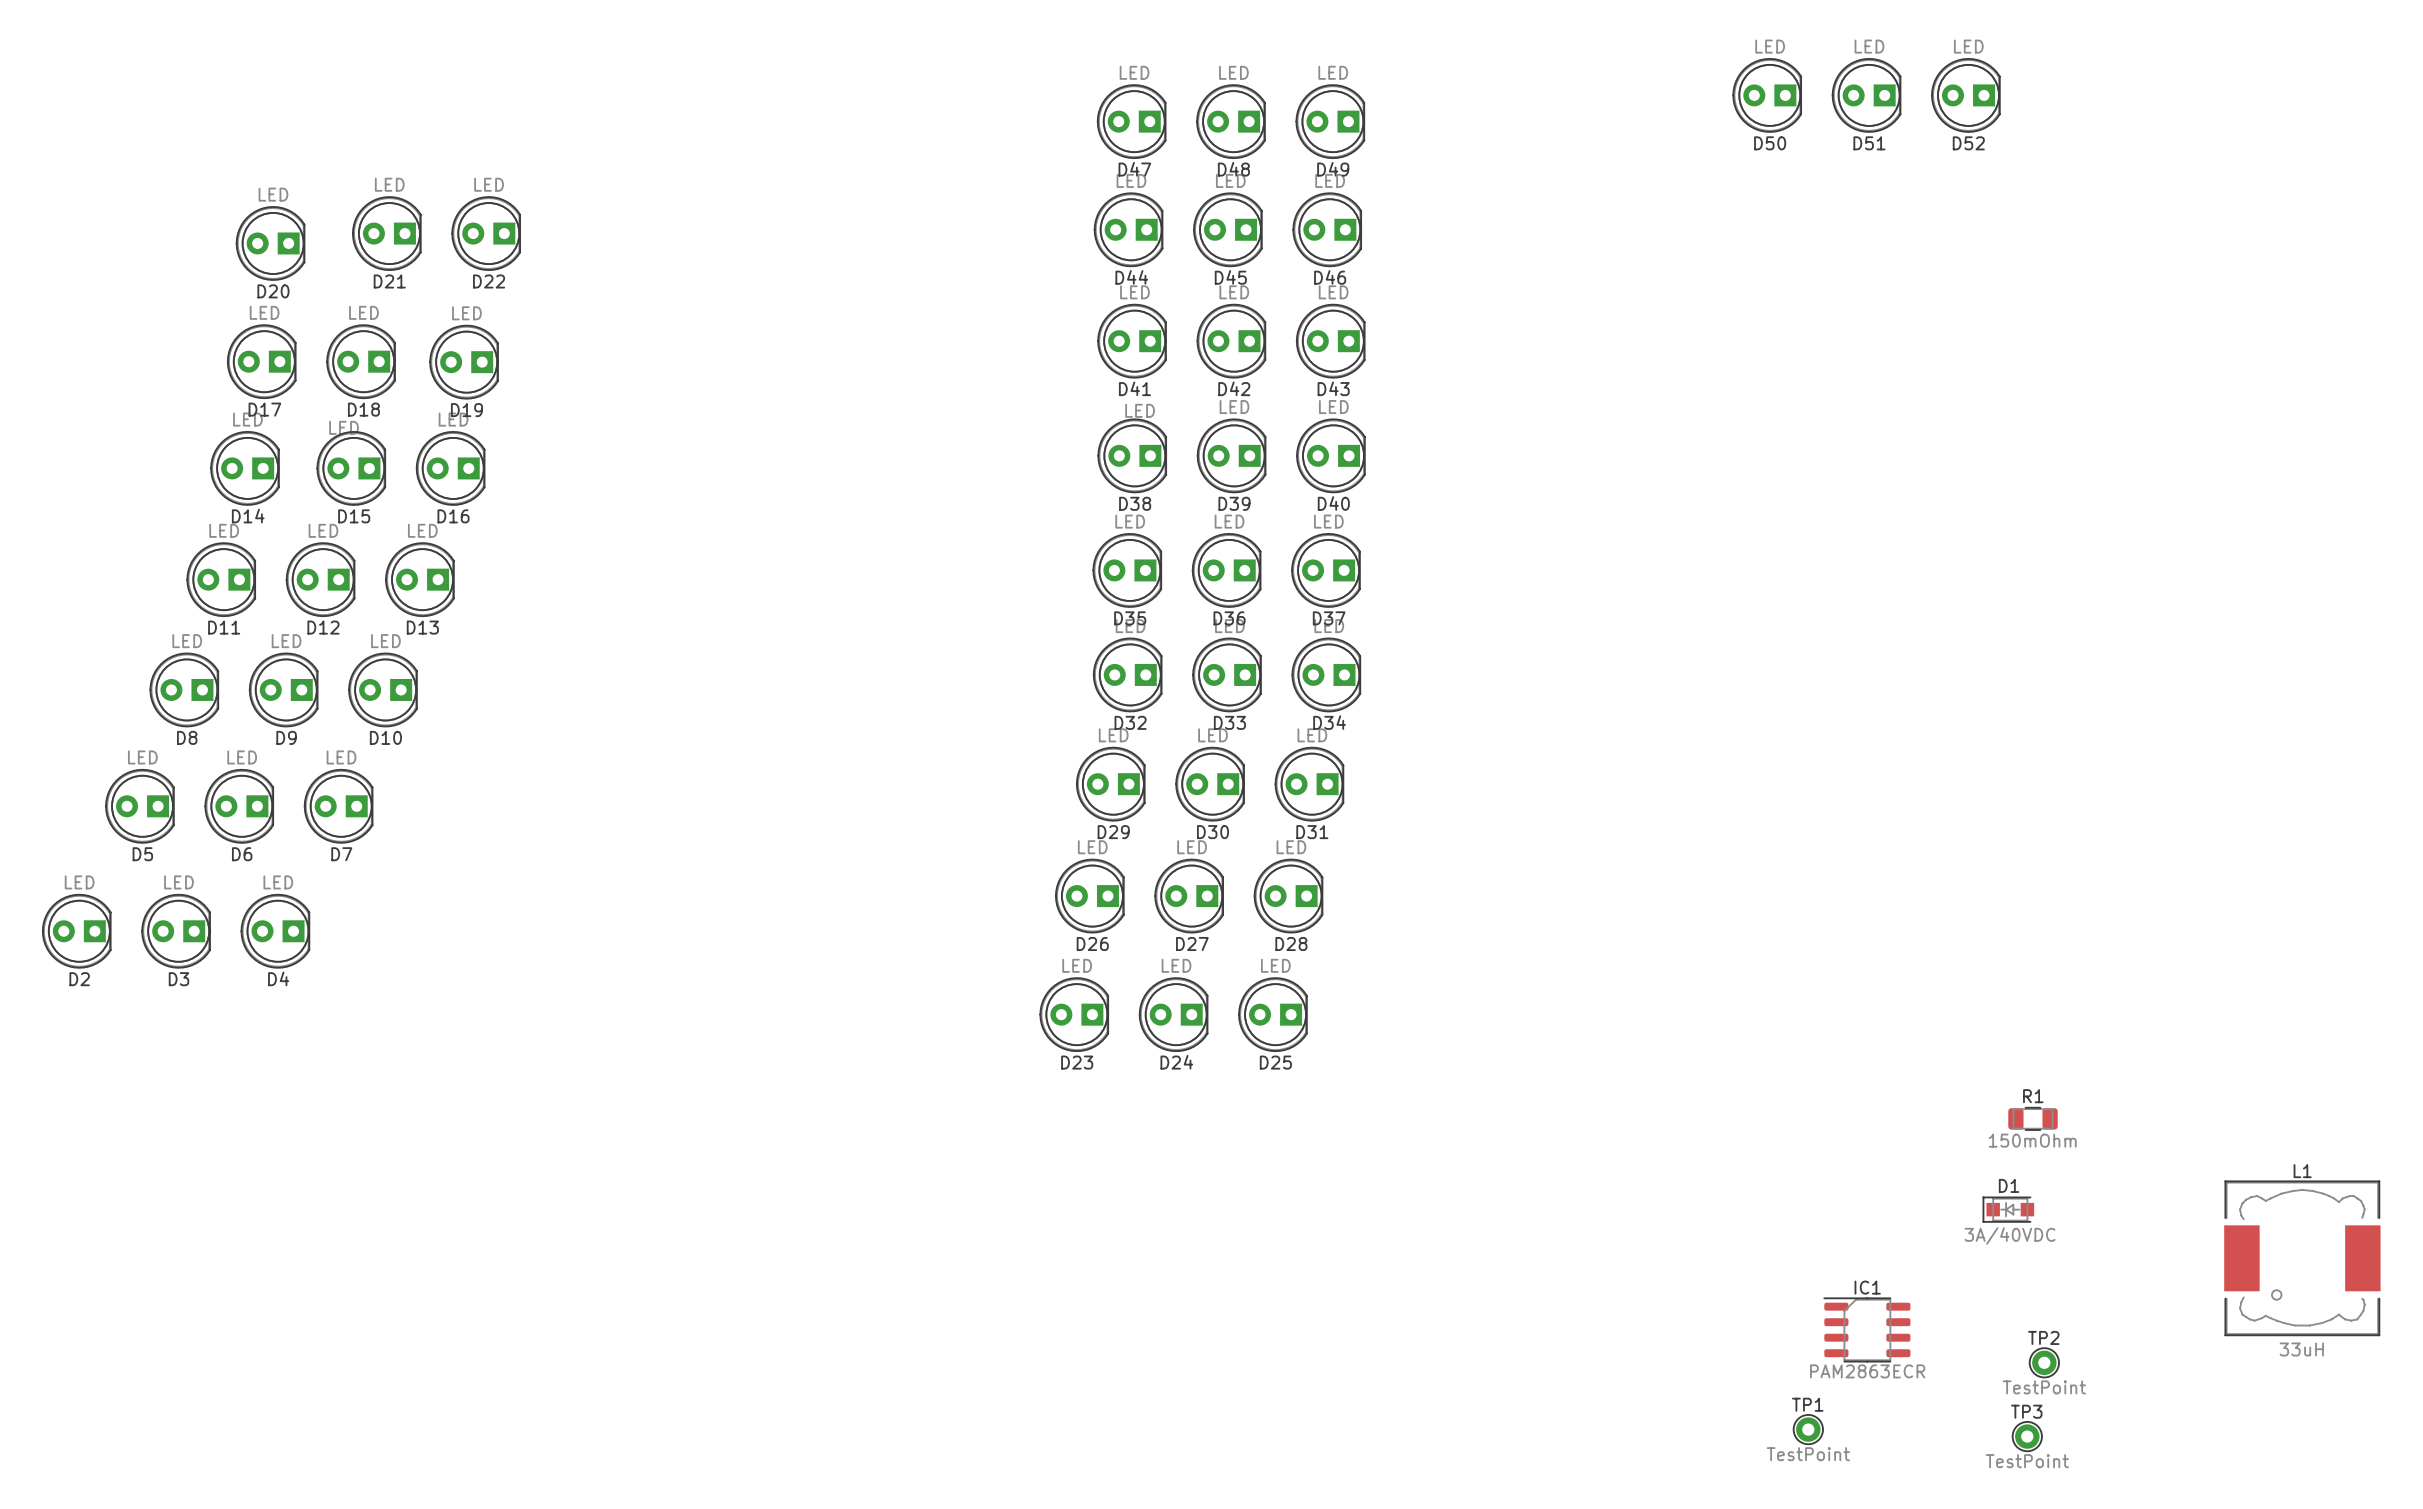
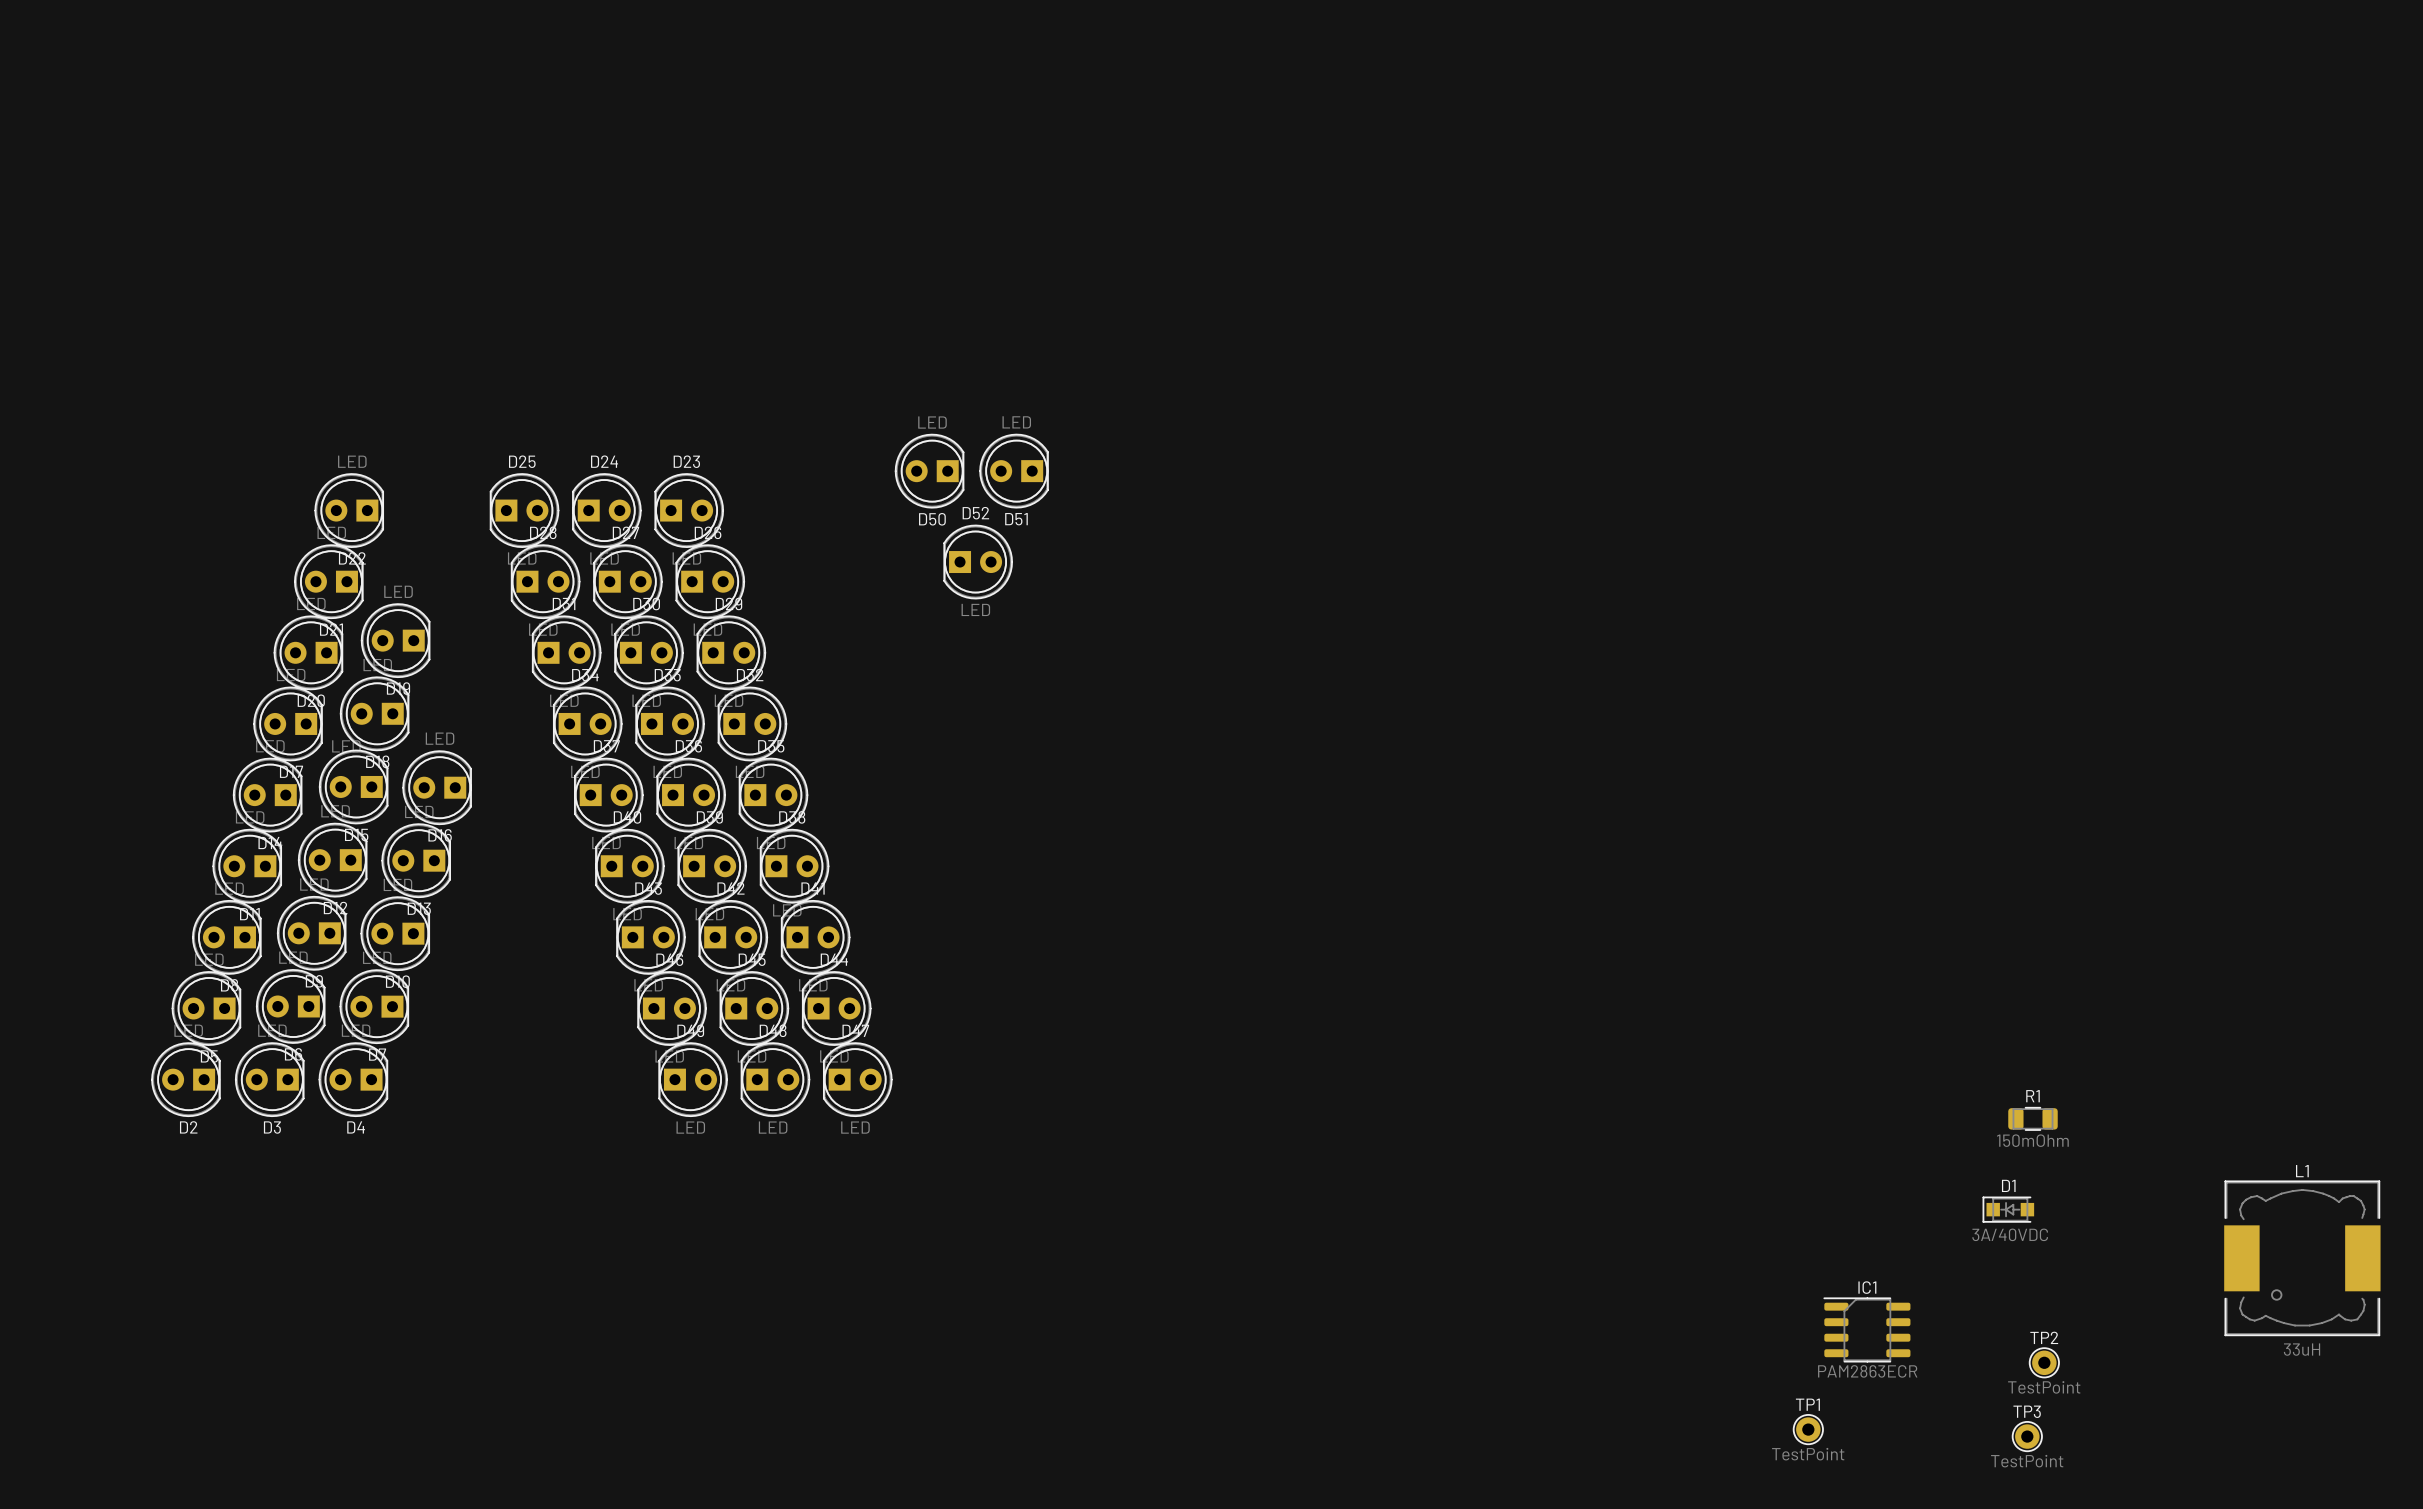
D50 position: (1767, 95) -> (929, 471)
D51 position: (1866, 95) -> (1014, 471)
D52 rotation: 0° (1965, 95) -> 180° (978, 562)
D52 position: (1965, 95) -> (978, 562)
D47 rotation: 0° (1131, 121) -> 180° (857, 1079)
D47 position: (1131, 121) -> (857, 1079)
D48 rotation: 0° (1230, 121) -> 180° (775, 1079)
D48 position: (1230, 121) -> (775, 1079)
D49 rotation: 0° (1330, 121) -> 180° (693, 1079)
D49 position: (1330, 121) -> (693, 1079)
D44 rotation: 0° (1128, 229) -> 180° (836, 1008)
D44 position: (1128, 229) -> (836, 1008)
D45 rotation: 0° (1227, 229) -> 180° (754, 1008)
D45 position: (1227, 229) -> (754, 1008)
D46 rotation: 0° (1327, 229) -> 180° (672, 1008)
D46 position: (1327, 229) -> (672, 1008)
D21 position: (386, 233) -> (328, 581)
D22 position: (486, 233) -> (349, 510)
D20 position: (270, 243) -> (308, 652)
D41 rotation: 0° (1132, 341) -> 180° (815, 937)
D41 position: (1132, 341) -> (815, 937)
D42 rotation: 0° (1231, 341) -> 180° (733, 937)
D42 position: (1231, 341) -> (733, 937)
D43 rotation: 0° (1330, 341) -> 180° (650, 937)
D43 position: (1330, 341) -> (650, 937)
D17 position: (261, 361) -> (288, 723)
D18 position: (361, 361) -> (374, 713)
D19 position: (464, 362) -> (395, 640)
D38 rotation: 0° (1132, 455) -> 180° (794, 866)
D38 position: (1132, 455) -> (794, 866)
D39 rotation: 0° (1231, 455) -> 180° (712, 866)
D39 position: (1231, 455) -> (712, 866)
D40 rotation: 0° (1330, 455) -> 180° (629, 866)
D40 position: (1330, 455) -> (629, 866)
D14 position: (245, 468) -> (267, 795)
D15 position: (351, 468) -> (353, 786)
D16 position: (450, 468) -> (437, 787)
D35 rotation: 0° (1127, 570) -> 180° (773, 795)
D35 position: (1127, 570) -> (773, 795)
D36 rotation: 0° (1226, 570) -> 180° (691, 795)
D36 position: (1226, 570) -> (691, 795)
D37 rotation: 0° (1325, 570) -> 180° (608, 795)
D37 position: (1325, 570) -> (608, 795)
D11 position: (221, 579) -> (247, 866)
D12 position: (320, 579) -> (332, 860)
D13 position: (419, 579) -> (416, 860)
D32 rotation: 0° (1127, 674) -> 180° (752, 723)
D32 position: (1127, 674) -> (752, 723)
D33 rotation: 0° (1227, 674) -> 180° (670, 723)
D33 position: (1227, 674) -> (670, 723)
D34 rotation: 0° (1326, 674) -> 180° (587, 723)
D34 position: (1326, 674) -> (587, 723)
D8 position: (184, 689) -> (226, 937)
D9 position: (283, 689) -> (311, 933)
D10 position: (382, 689) -> (395, 933)
D29 rotation: 0° (1110, 784) -> 180° (731, 652)
D29 position: (1110, 784) -> (731, 652)
D30 rotation: 0° (1210, 784) -> 180° (649, 652)
D30 position: (1210, 784) -> (649, 652)
D31 rotation: 0° (1309, 784) -> 180° (566, 652)
D31 position: (1309, 784) -> (566, 652)
D5 position: (139, 806) -> (206, 1008)
D6 position: (239, 806) -> (290, 1006)
D7 position: (338, 806) -> (374, 1006)
D26 rotation: 0° (1089, 896) -> 180° (710, 581)
D26 position: (1089, 896) -> (710, 581)
D27 rotation: 0° (1189, 896) -> 180° (627, 581)
D27 position: (1189, 896) -> (627, 581)
D28 rotation: 0° (1288, 896) -> 180° (545, 581)
D28 position: (1288, 896) -> (545, 581)
D2 position: (76, 931) -> (185, 1079)
D3 position: (176, 931) -> (269, 1079)
D4 position: (275, 931) -> (353, 1079)
D23 rotation: 0° (1074, 1014) -> 180° (689, 510)
D23 position: (1074, 1014) -> (689, 510)
D24 rotation: 0° (1173, 1014) -> 180° (606, 510)
D24 position: (1173, 1014) -> (606, 510)
D25 rotation: 0° (1272, 1014) -> 180° (524, 510)
D25 position: (1272, 1014) -> (524, 510)

